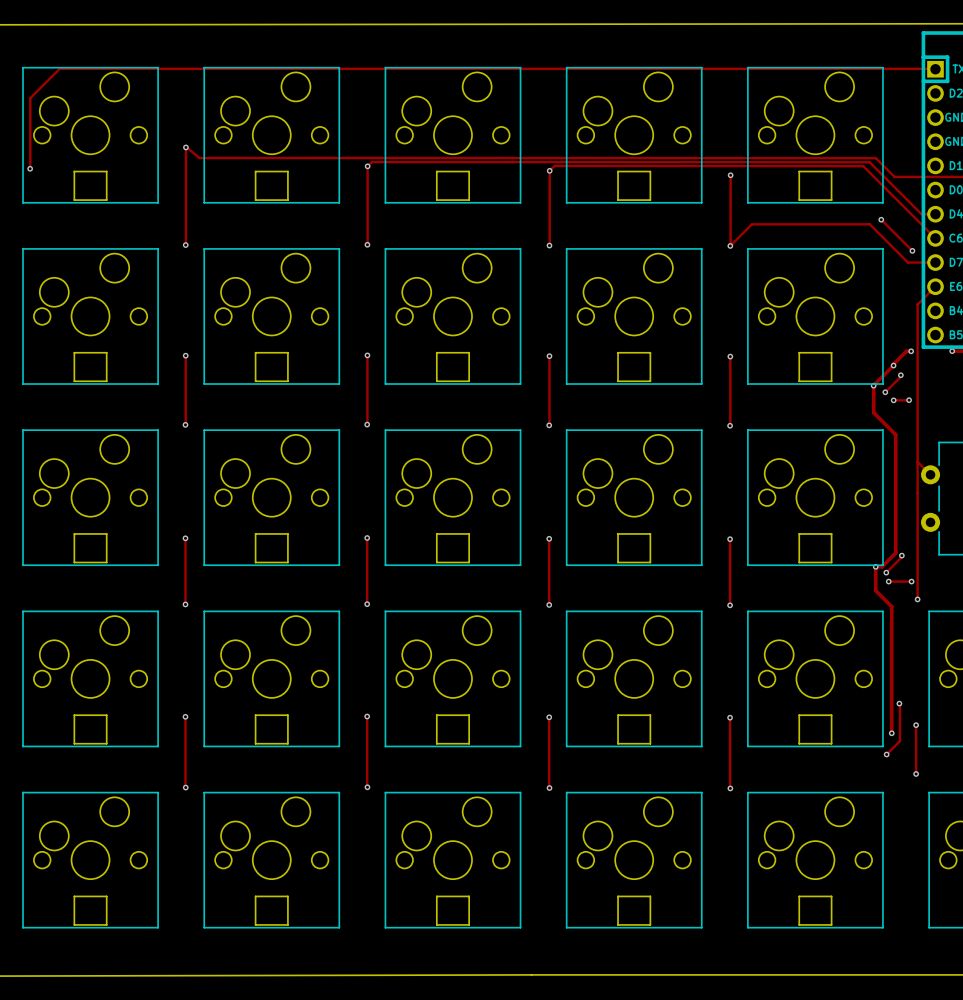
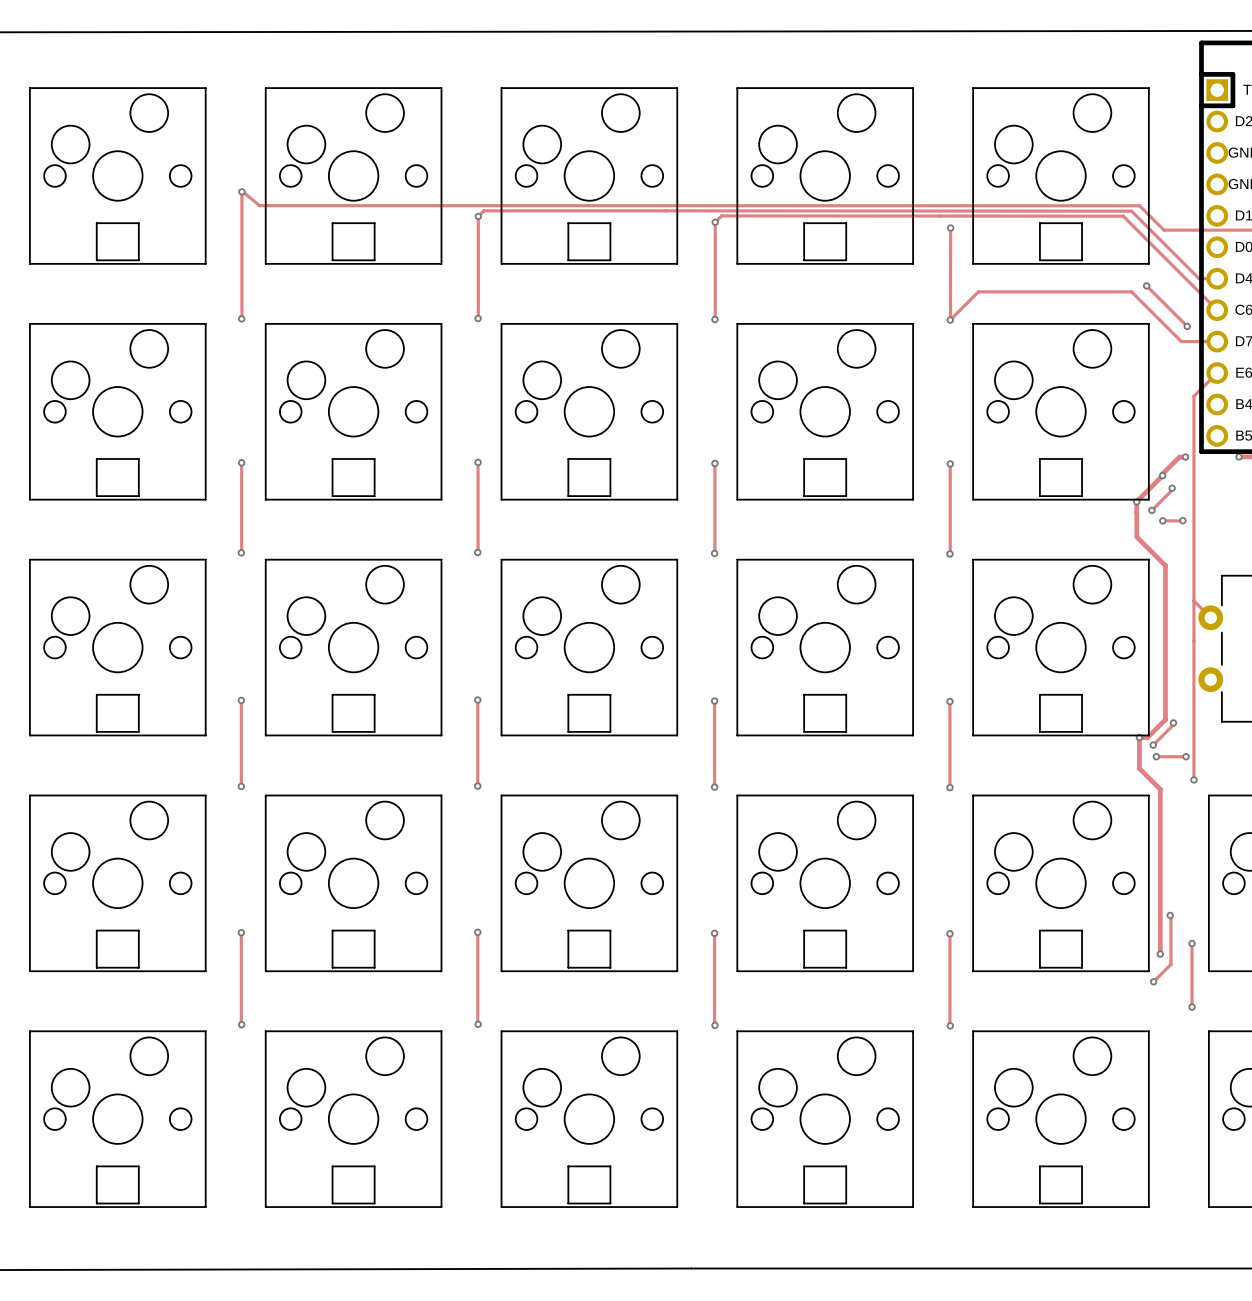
track: (935, 69) (59, 68) (30, 98) (30, 169) -> none
via: (30, 168) -> none

